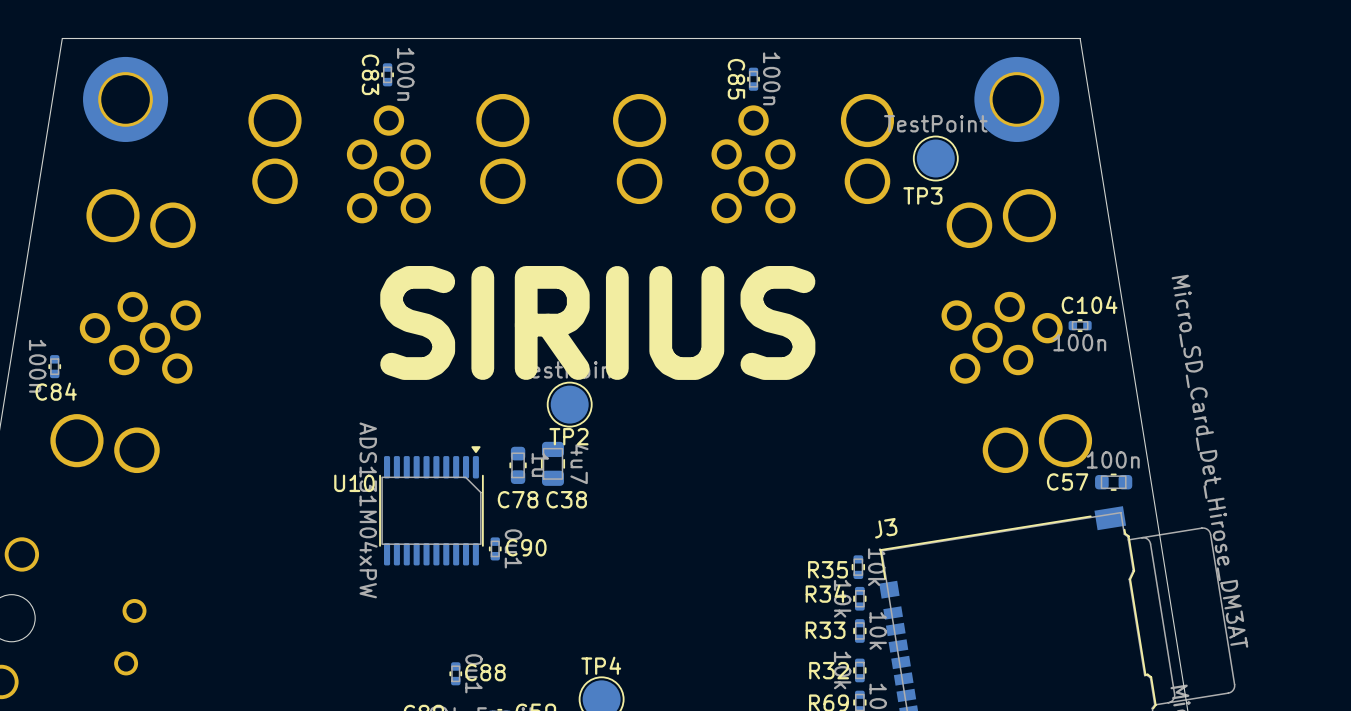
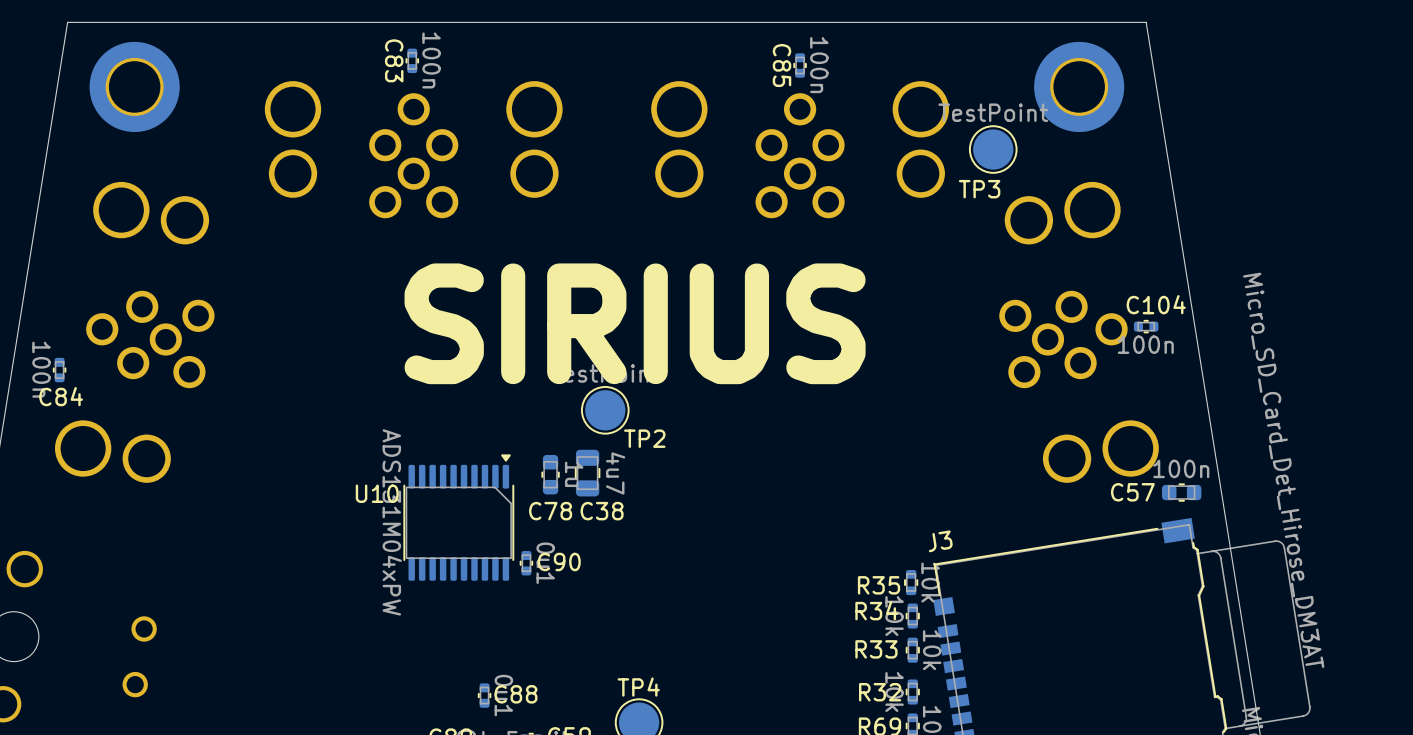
TP2 name position: TP2 (568, 436) -> TP2 (644, 438)

